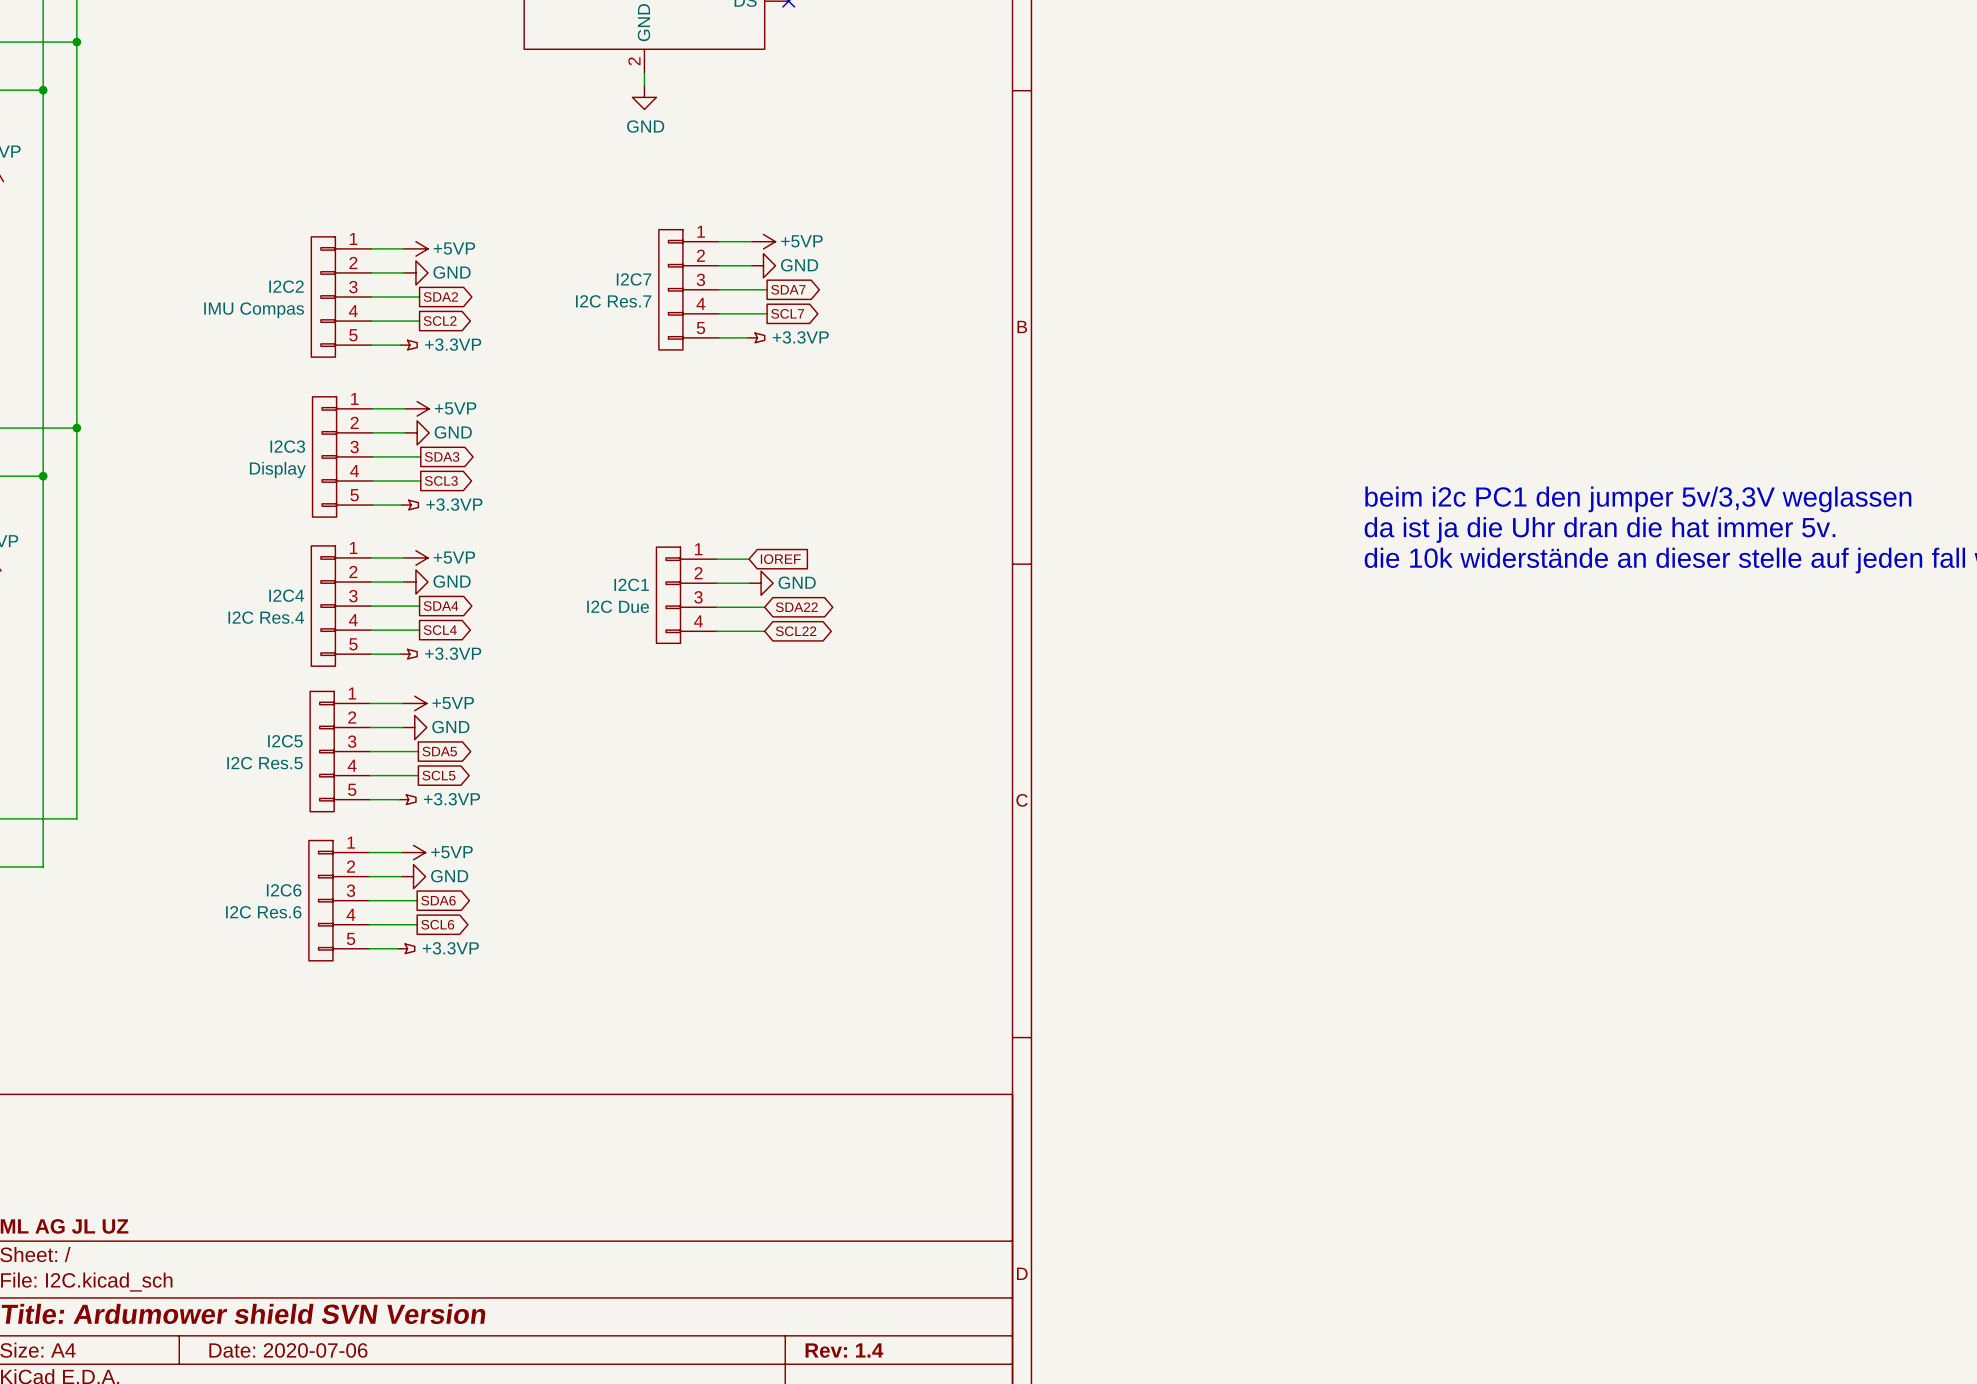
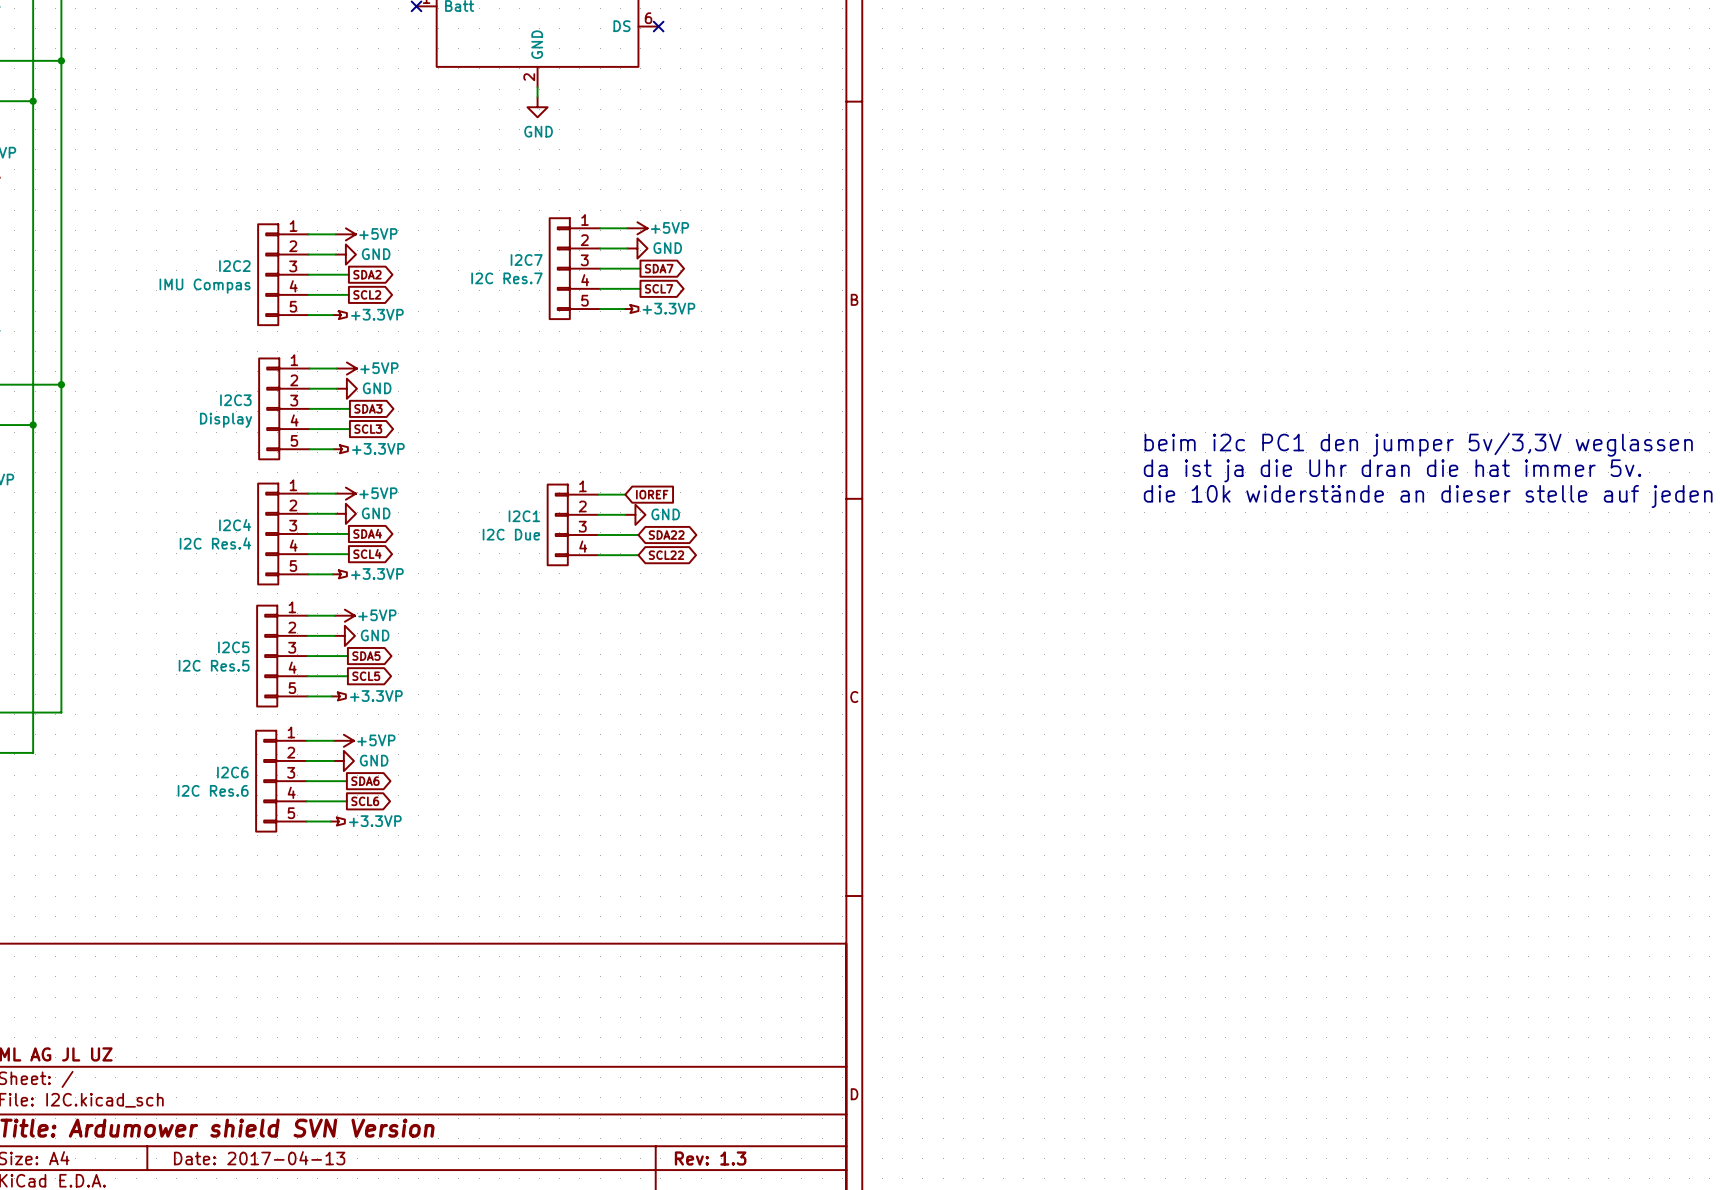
title block: Date: 2020-07-06 (288, 1350) -> Date: 2017-04-13 (259, 1158)
title block: Rev: 1.4 (844, 1350) -> Rev: 1.3 (710, 1158)

